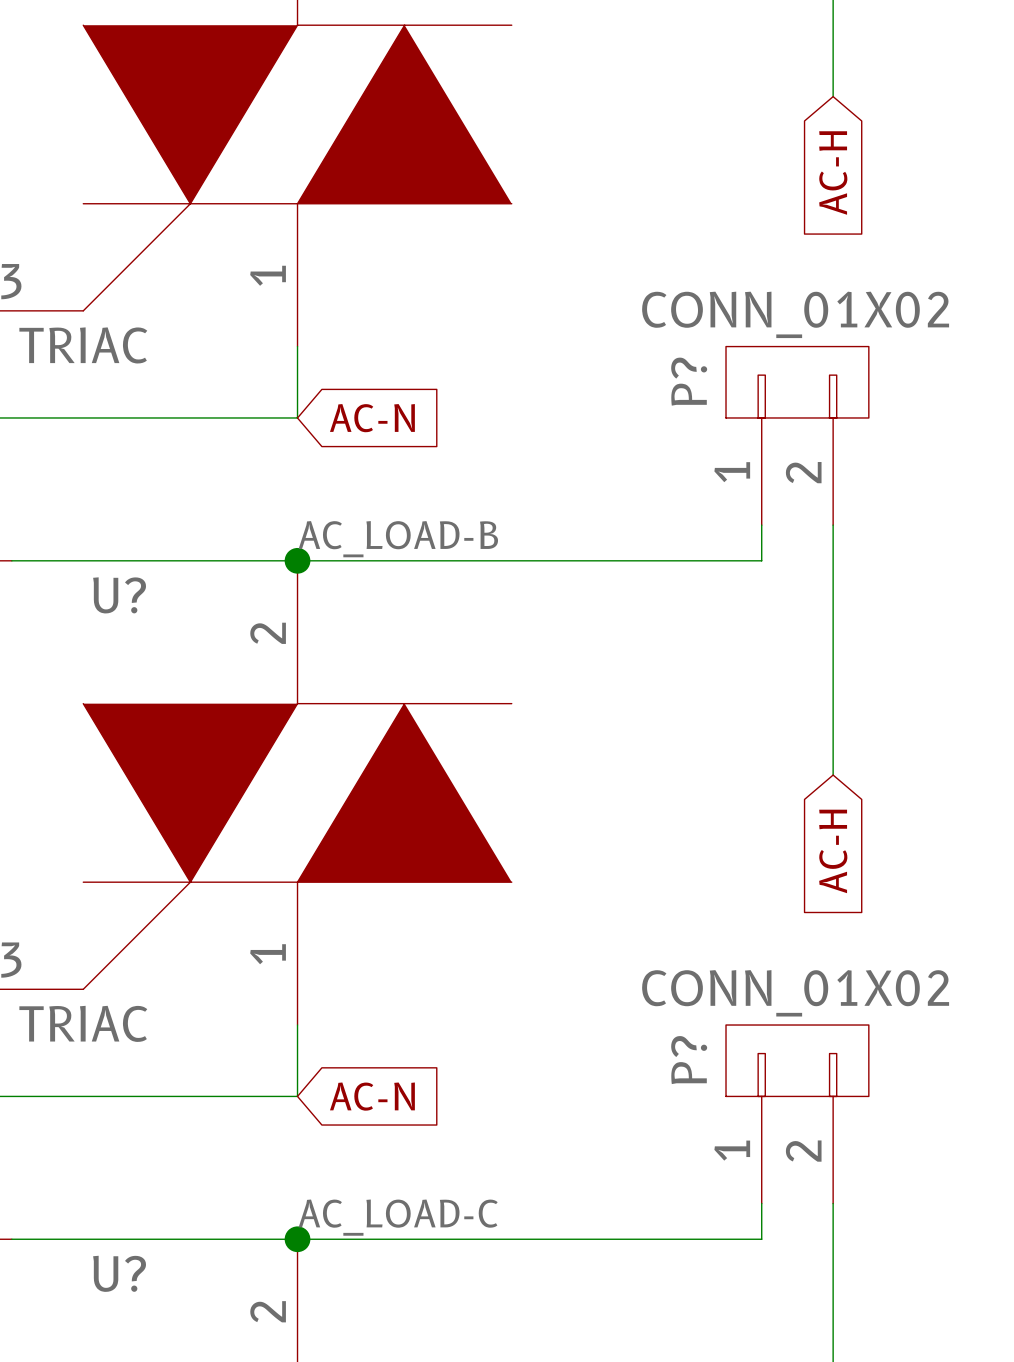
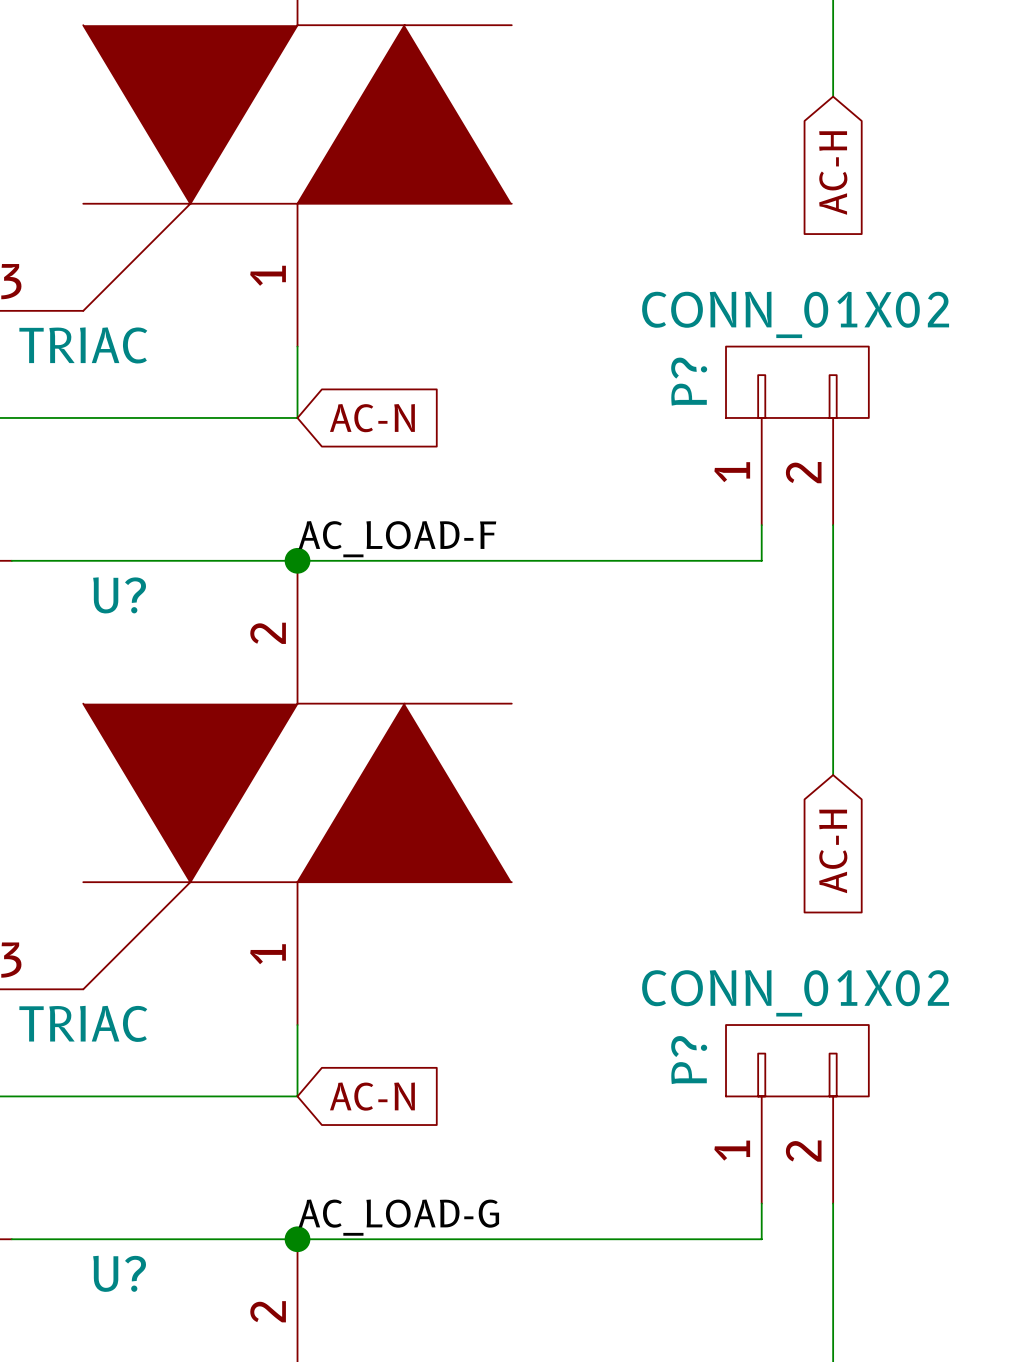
label: AC_LOAD-B (398, 539) -> AC_LOAD-F (397, 539)
label: AC_LOAD-C (398, 1217) -> AC_LOAD-G (398, 1217)

